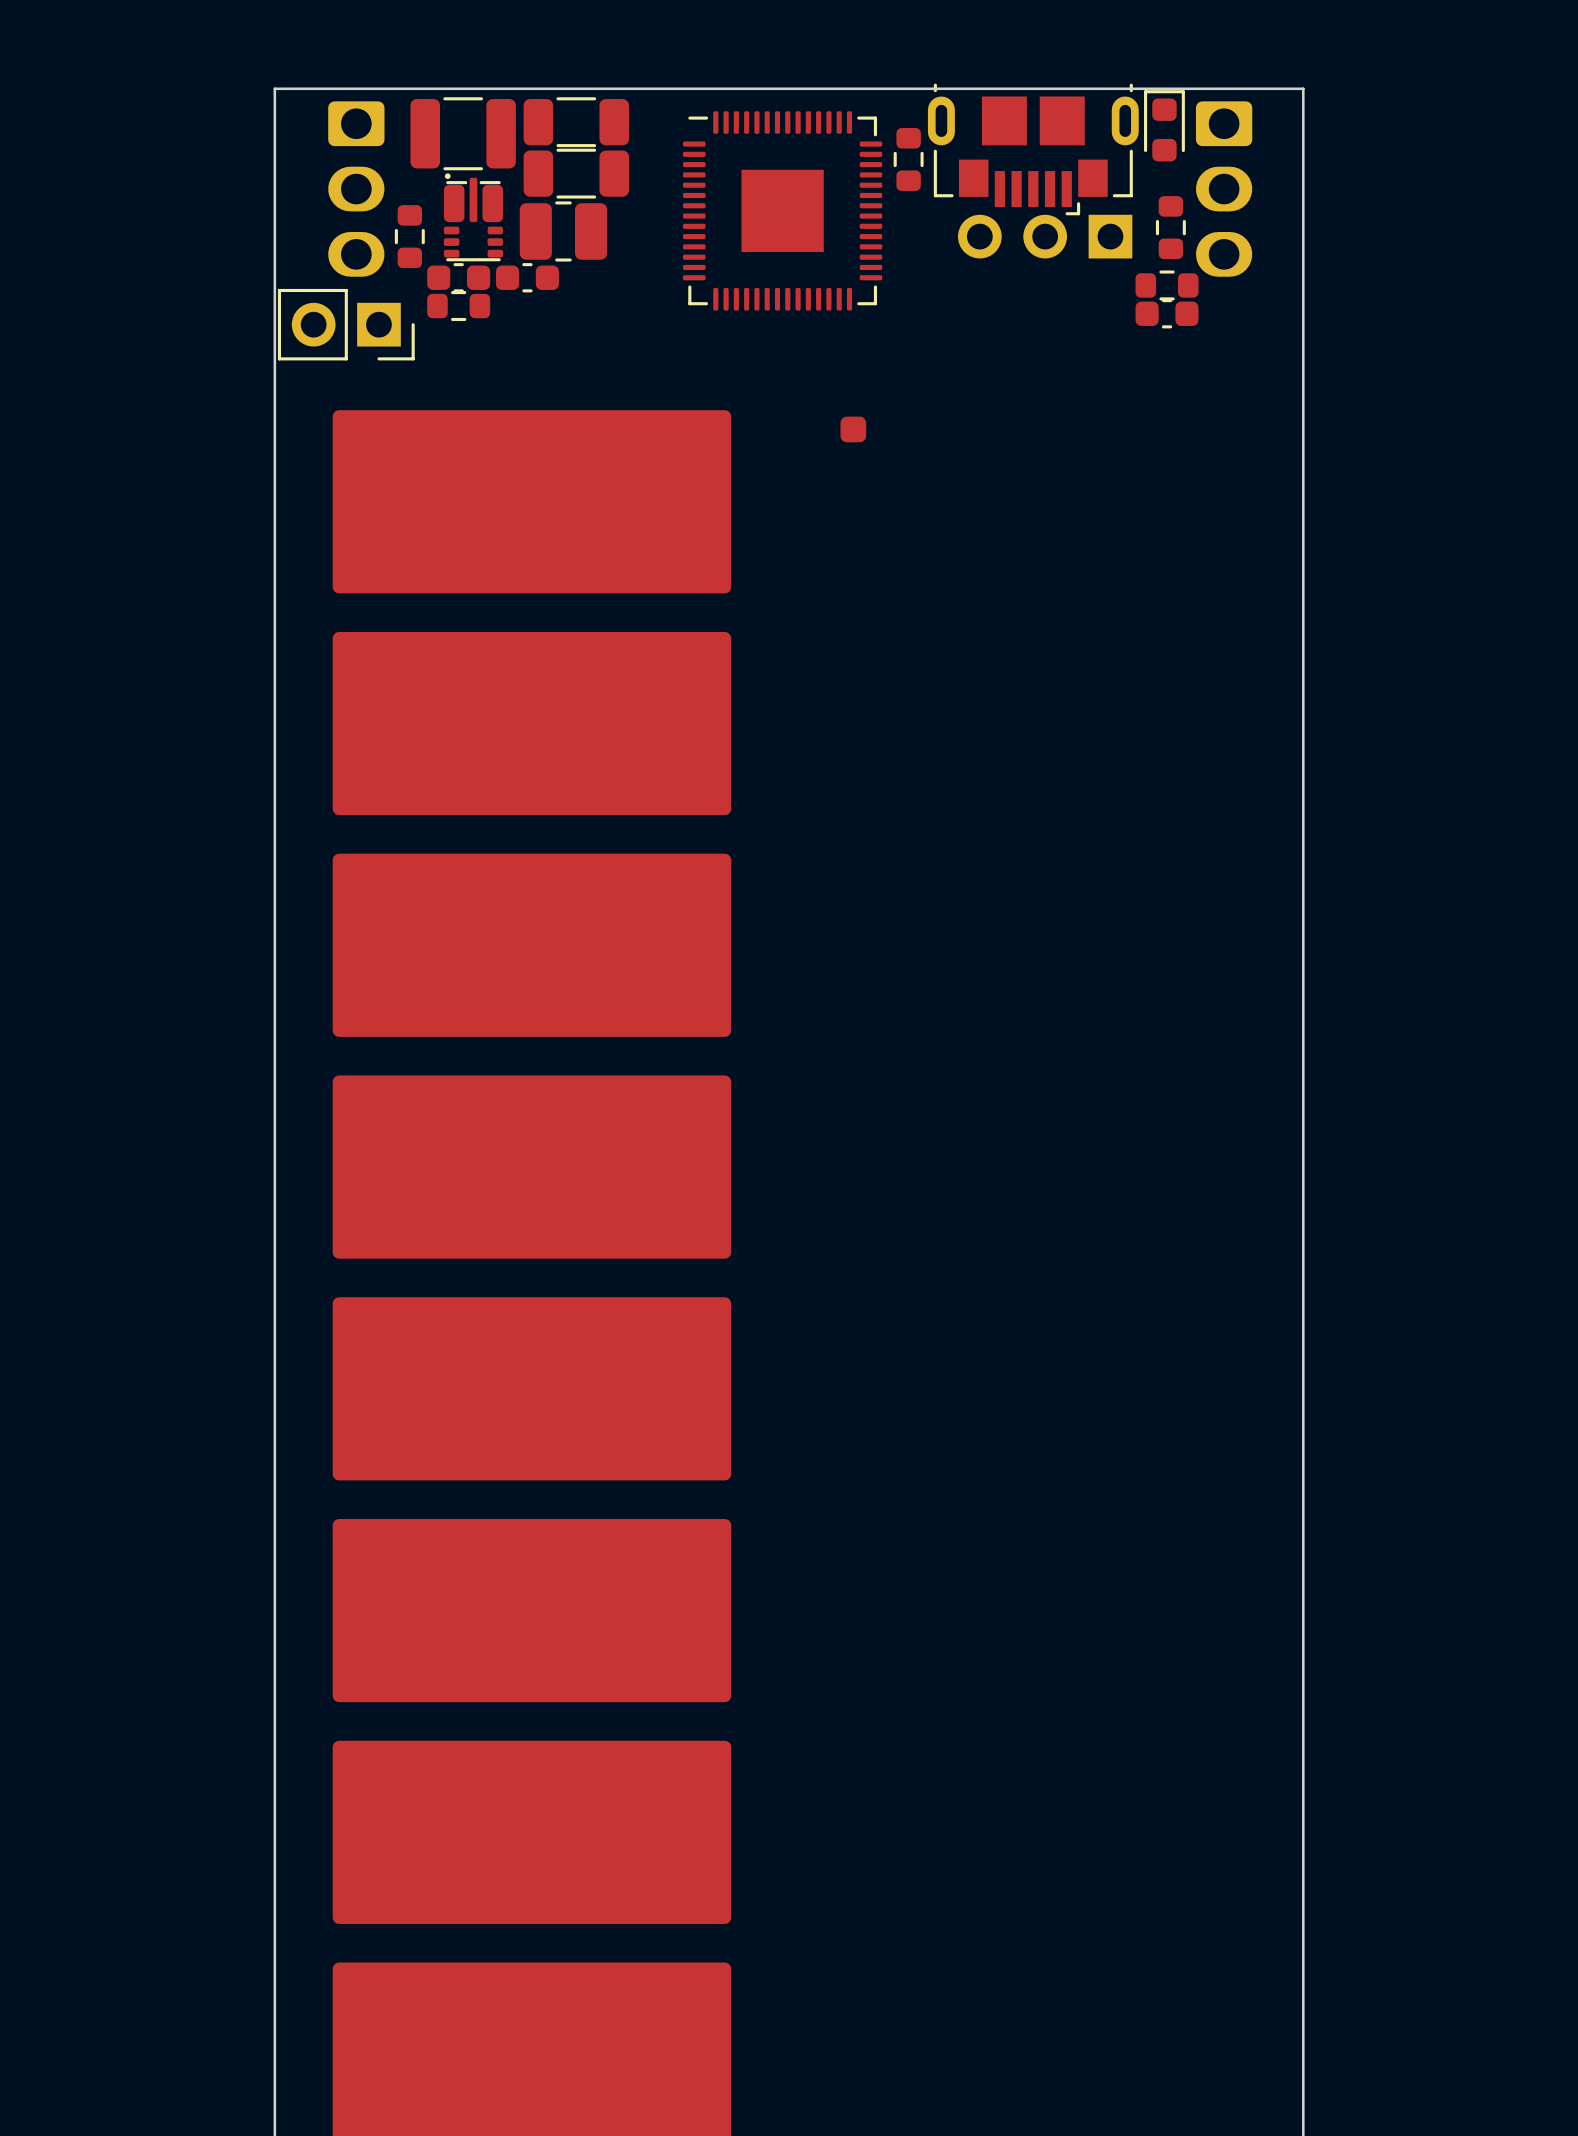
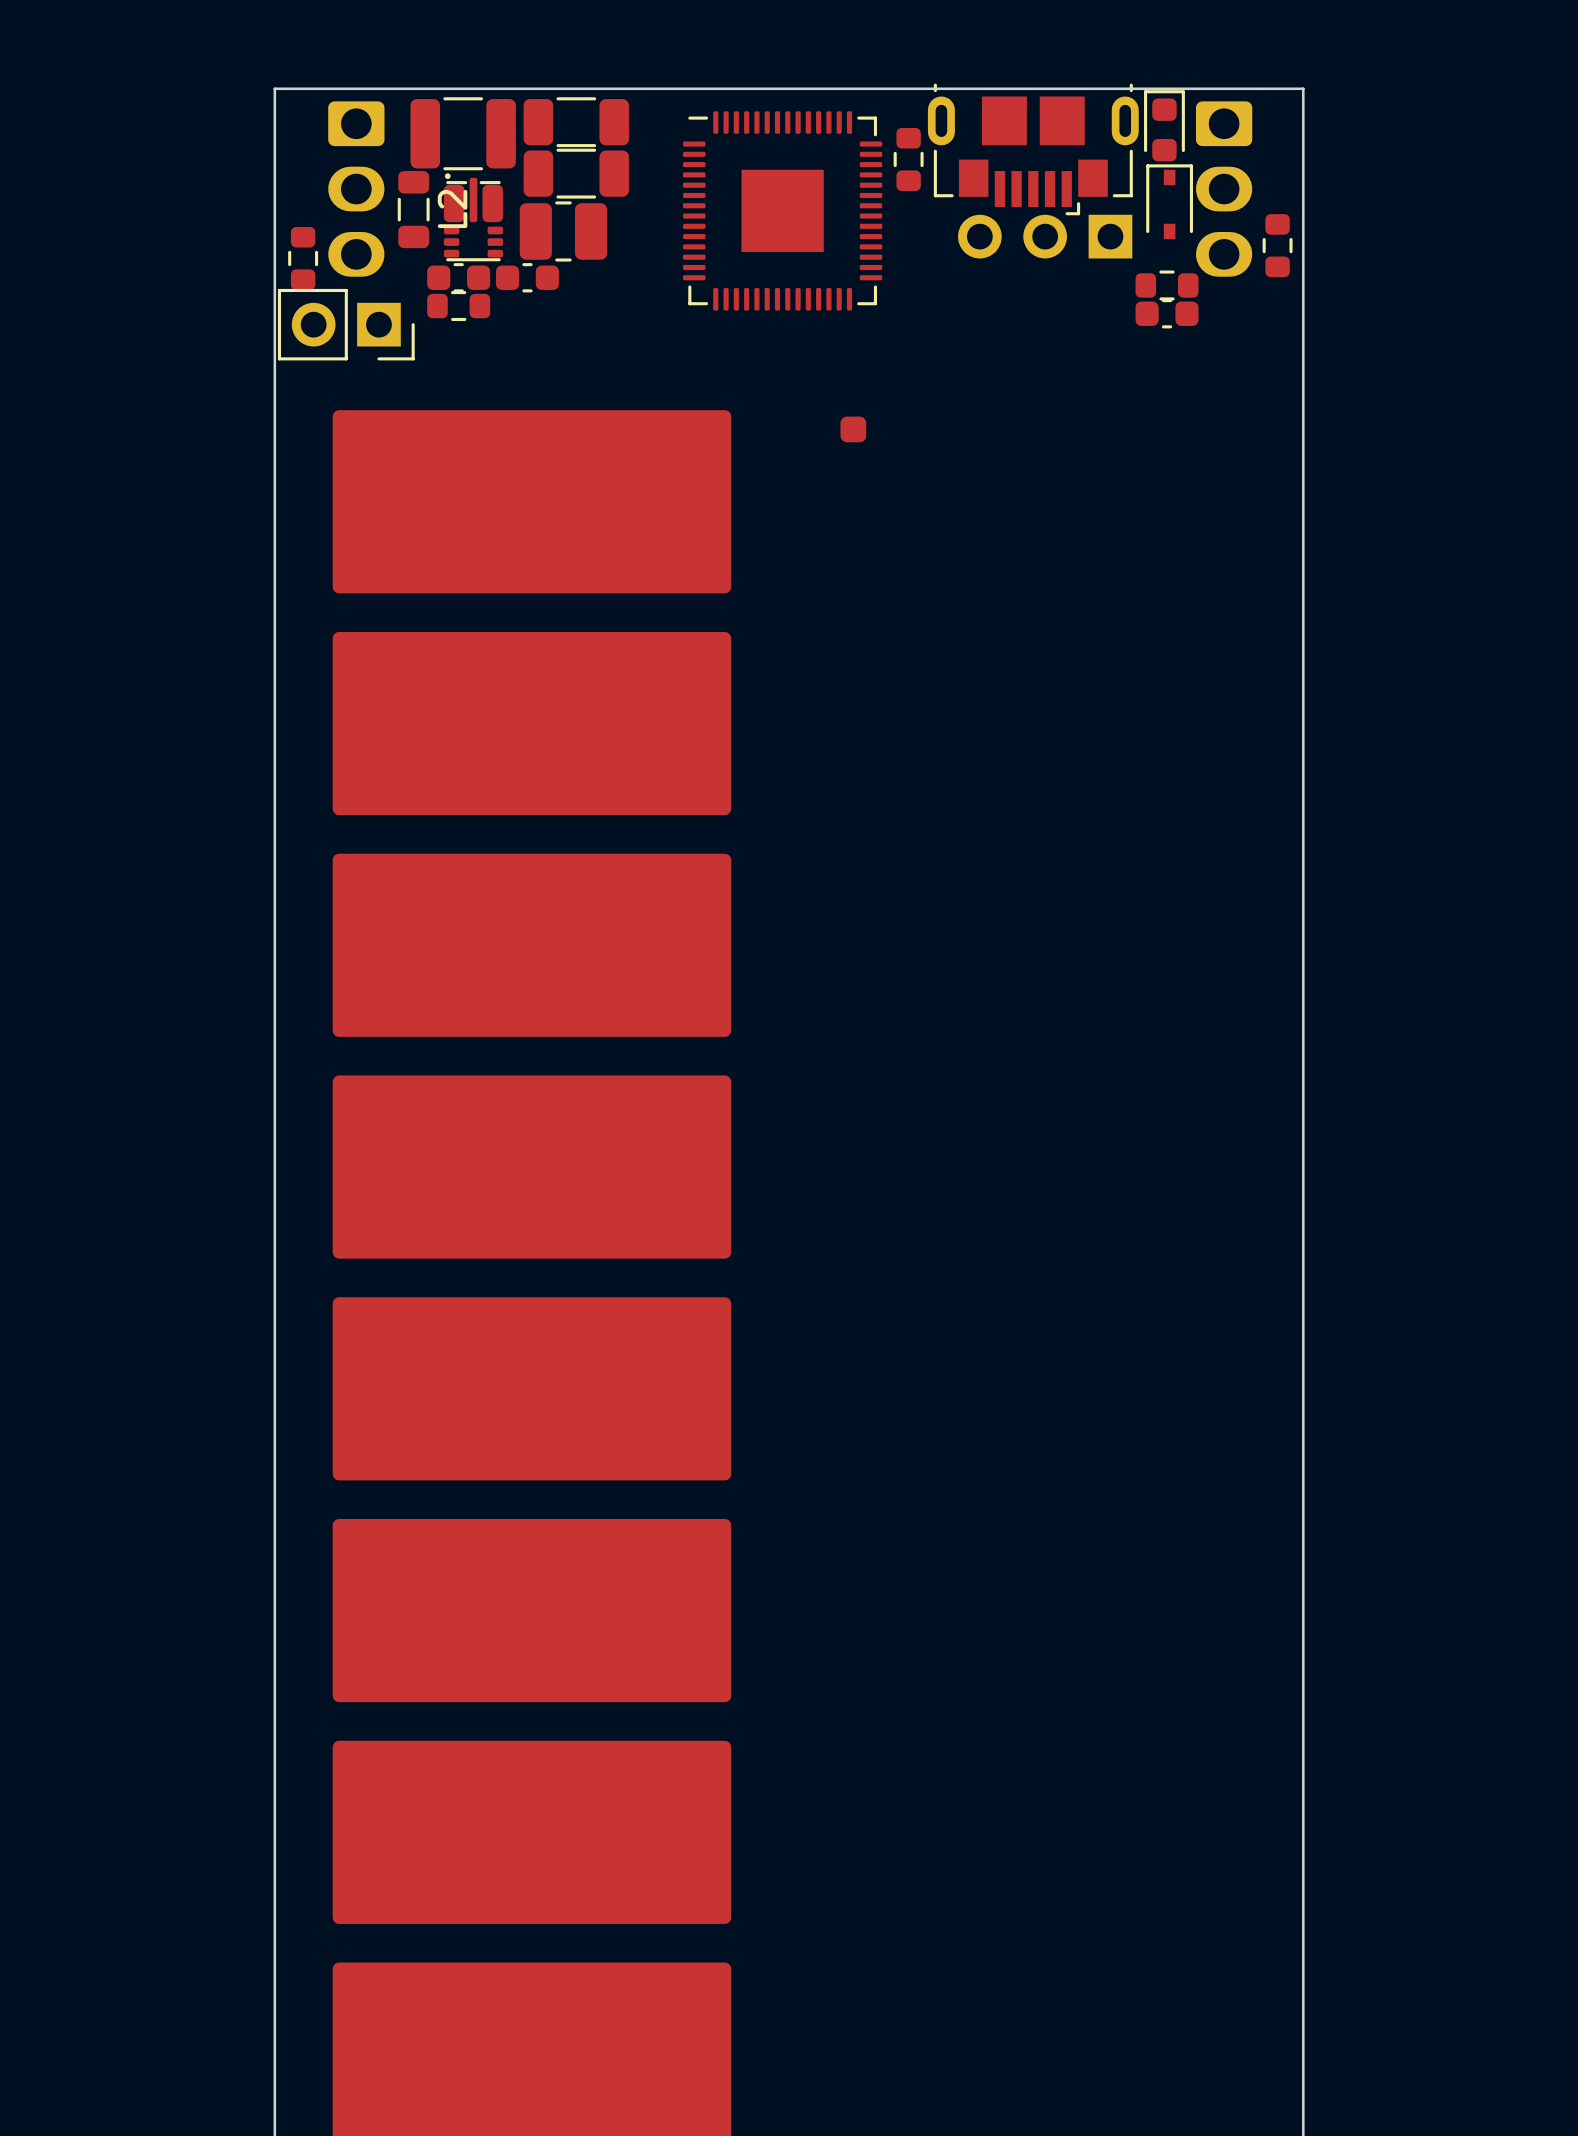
part: none -> (1169, 201)
L2: none -> (413, 209)
part position: (1170, 227) -> (1277, 245)
part position: (409, 236) -> (303, 258)

